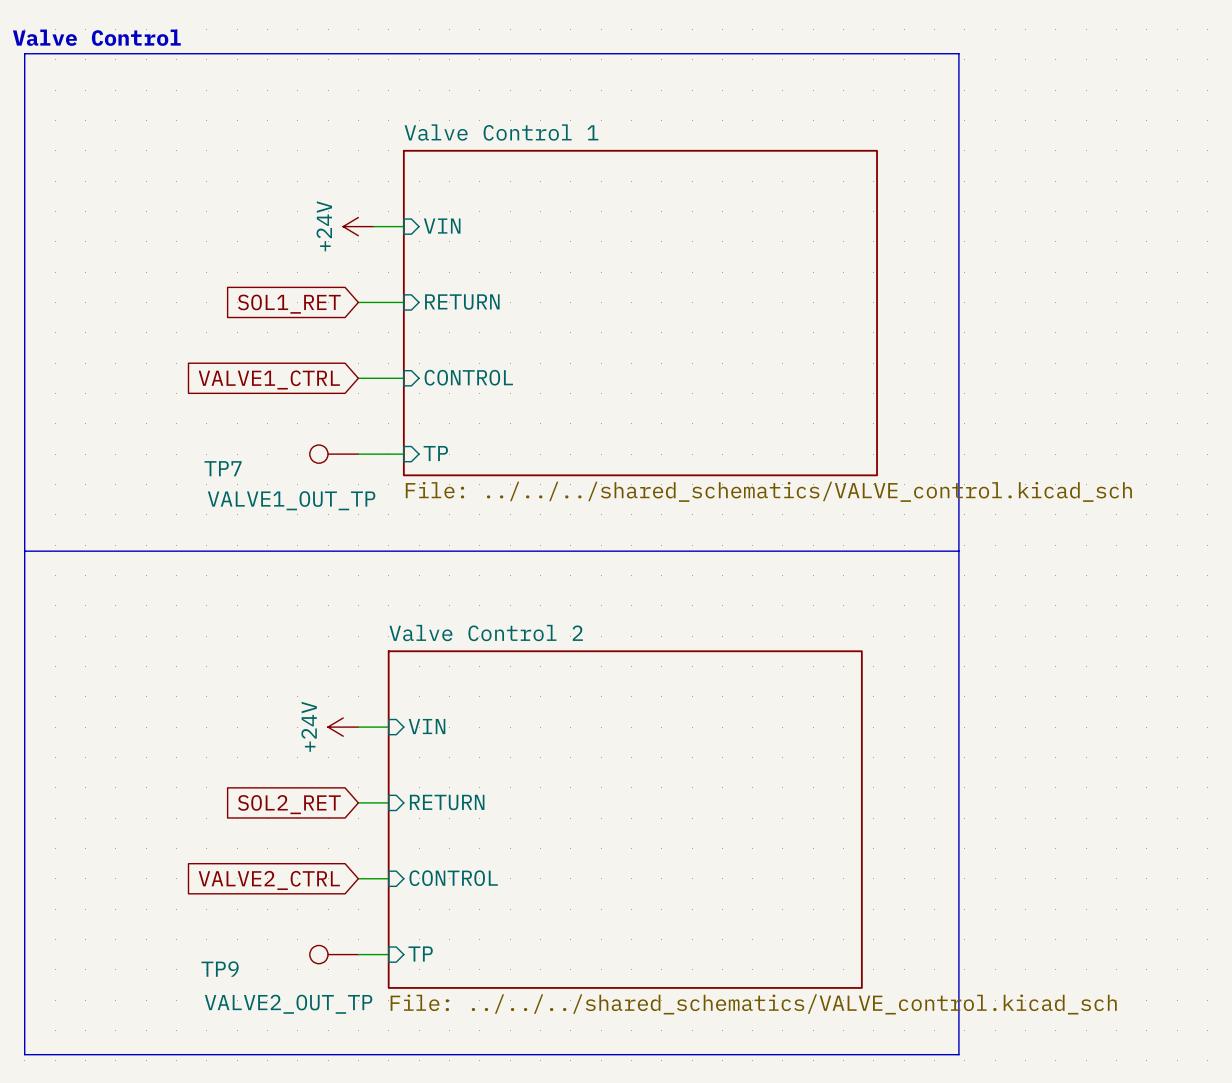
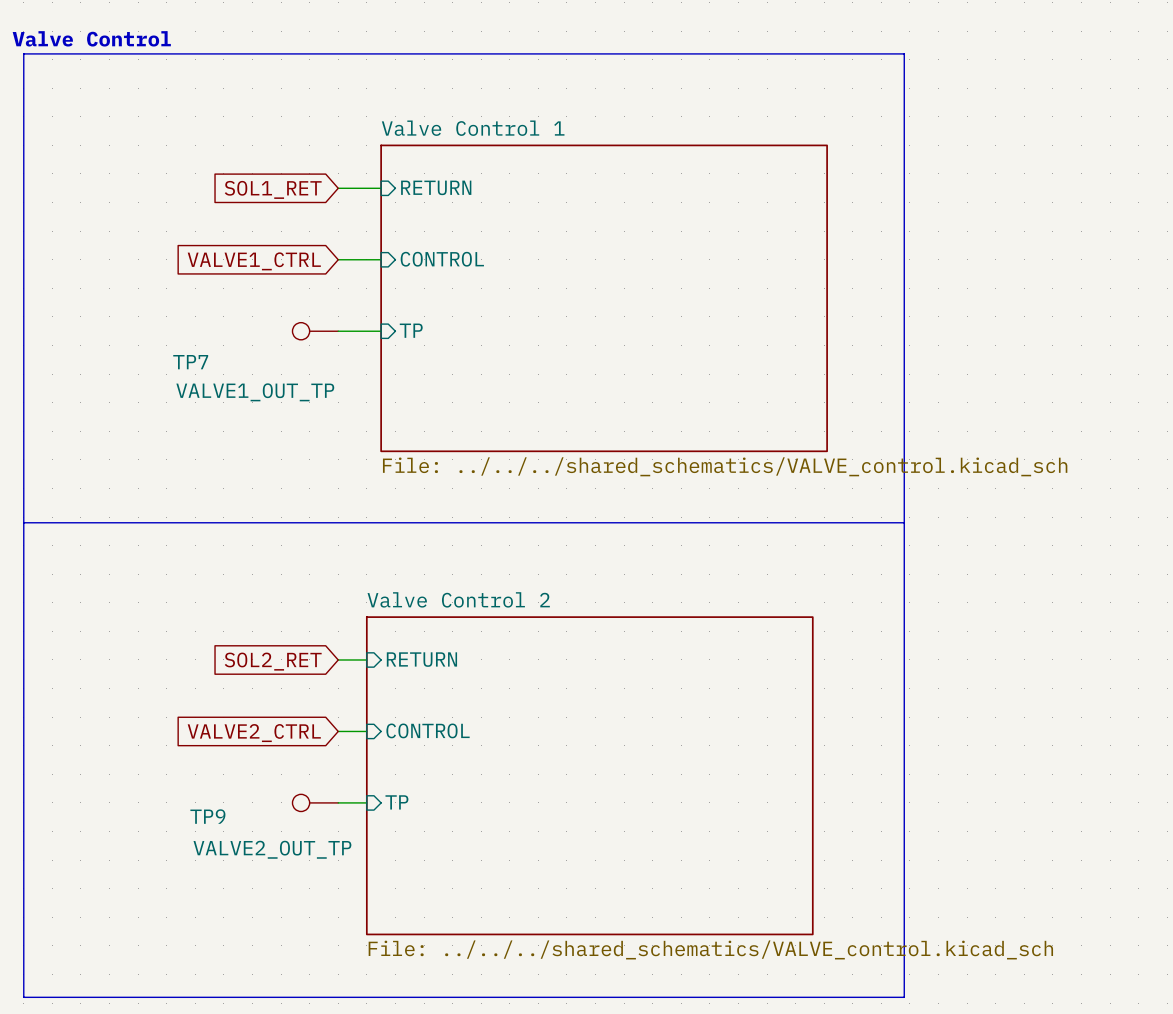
power symbol: +24V (358, 226) -> none
wire: (373, 226) (403, 226) -> none
sheet pin: VIN (442, 226) -> none
wire: (358, 302) (403, 302) -> (338, 188) (381, 188)
sheet pin position: RETURN (462, 302) -> RETURN (436, 187)
global label position: SOL1_RET (289, 304) -> SOL1_RET (273, 189)
sheet pin position: CONTROL (468, 377) -> CONTROL (442, 259)
wire: (358, 378) (403, 378) -> (338, 259) (381, 259)
global label position: VALVE1_CTRL (269, 379) -> VALVE1_CTRL (254, 261)
sheet pin position: TP (435, 453) -> TP (411, 330)
TP7 position: (334, 454) -> (315, 331)
wire: (358, 454) (403, 454) -> (338, 331) (381, 331)
TP7 name position: TP7 (223, 468) -> TP7 (190, 362)
TP7 value position: VALVE1_OUT_TP (291, 500) -> VALVE1_OUT_TP (255, 392)
sheet pin: VIN (427, 726) -> none
power symbol: +24V (343, 727) -> none
wire: (358, 727) (388, 727) -> none
wire: (358, 802) (388, 802) -> (338, 659) (366, 659)
sheet pin position: RETURN (447, 802) -> RETURN (421, 659)
global label position: SOL2_RET (289, 804) -> SOL2_RET (273, 661)
wire: (358, 878) (388, 878) -> (338, 731) (366, 731)
sheet pin position: CONTROL (453, 878) -> CONTROL (428, 730)
global label position: VALVE2_CTRL (269, 880) -> VALVE2_CTRL (254, 733)
TP9 position: (334, 954) -> (315, 802)
wire: (358, 954) (388, 954) -> (338, 802) (366, 802)
sheet pin position: TP (420, 954) -> TP (396, 802)

